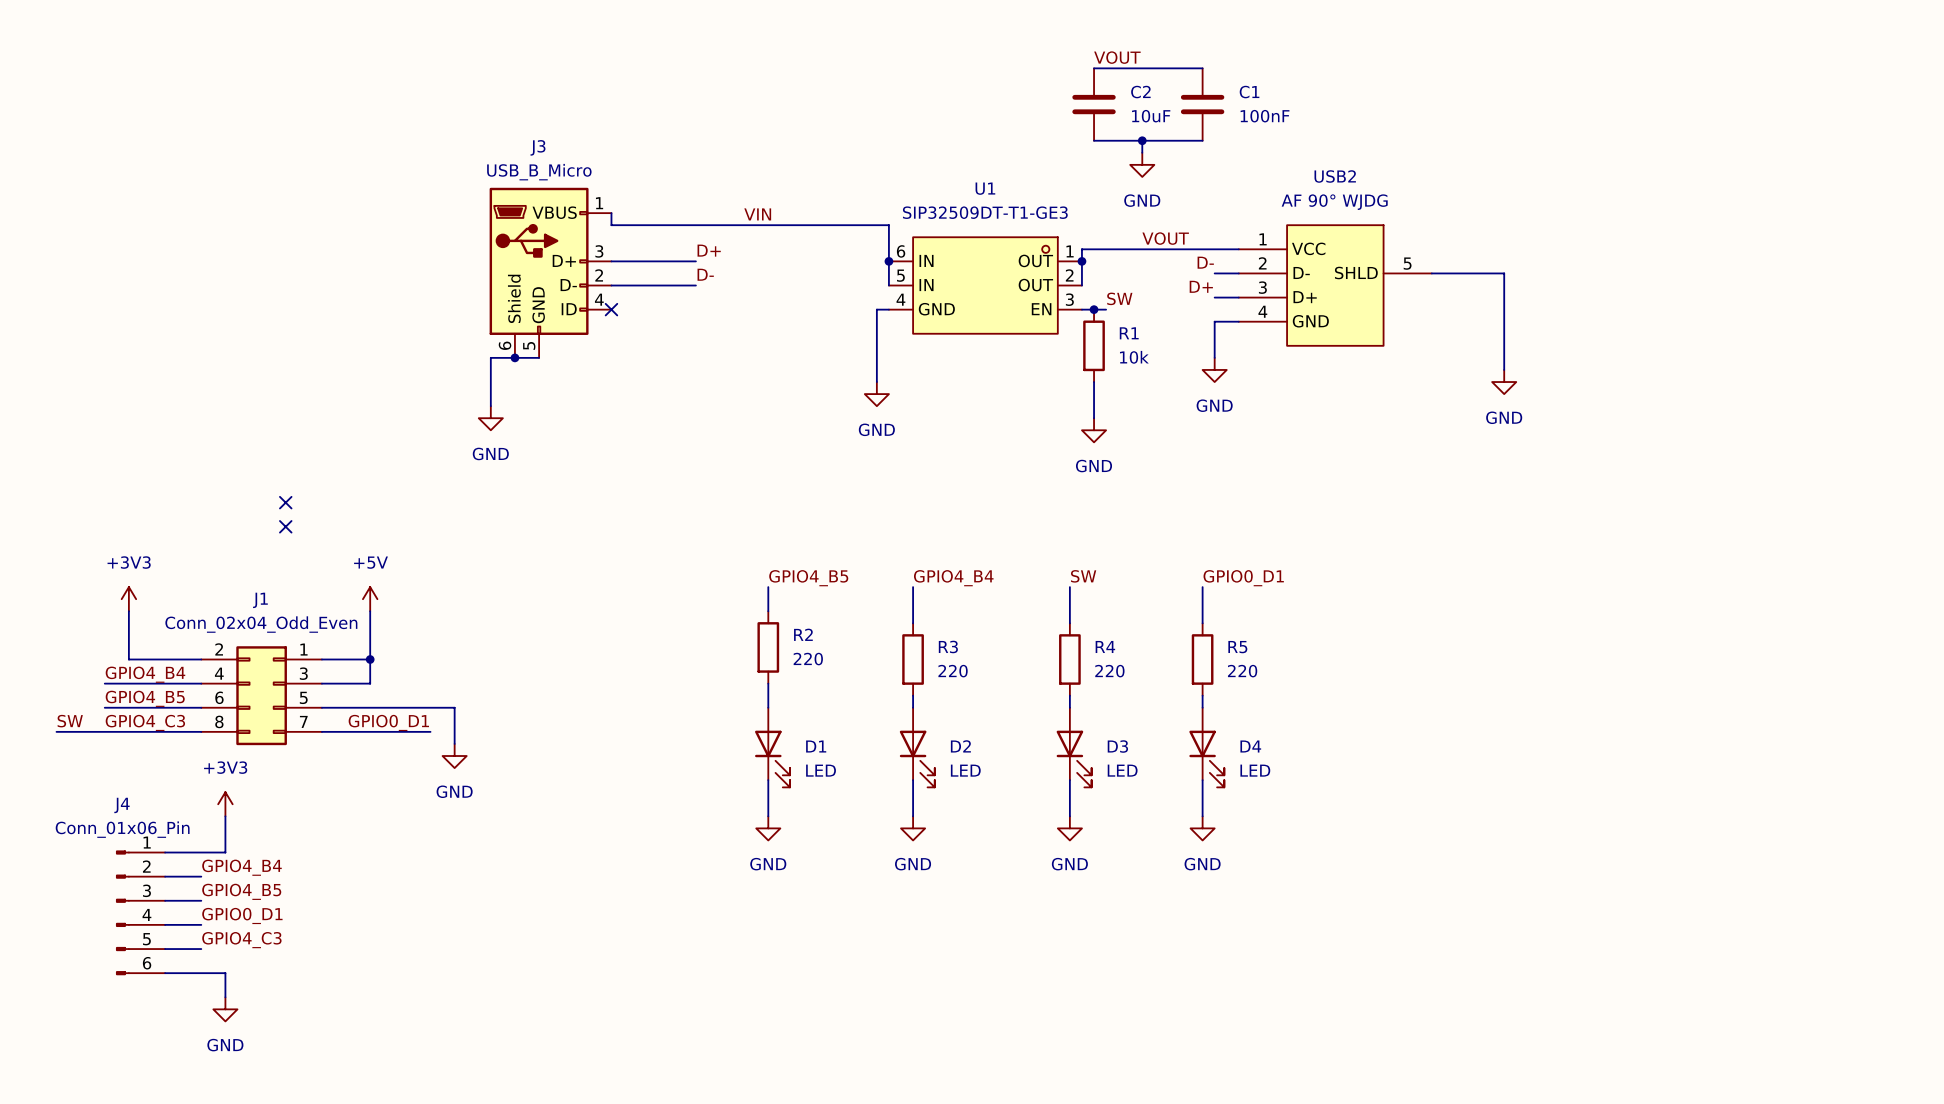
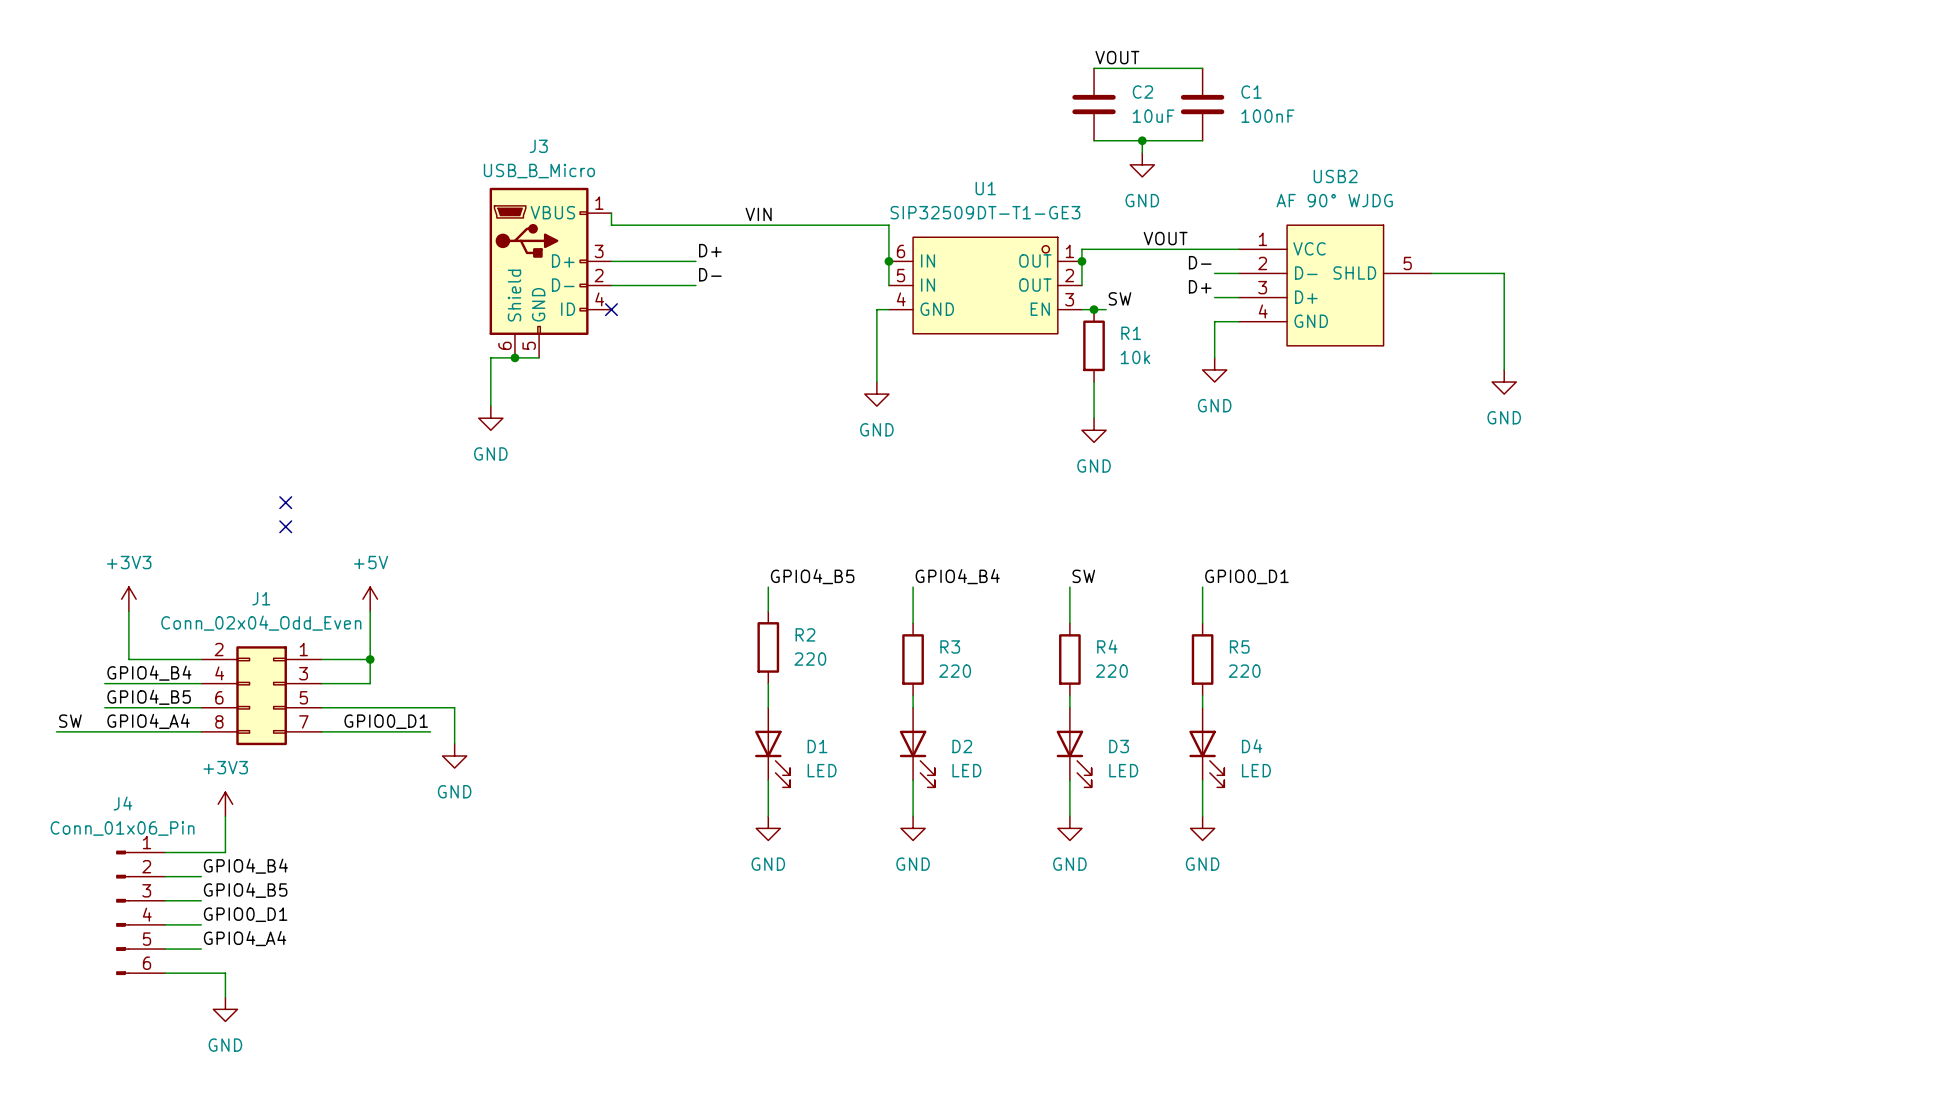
label: GPIO4_C3 (145, 722) -> GPIO4_A4 (148, 721)
label: GPIO4_C3 (241, 940) -> GPIO4_A4 (245, 938)

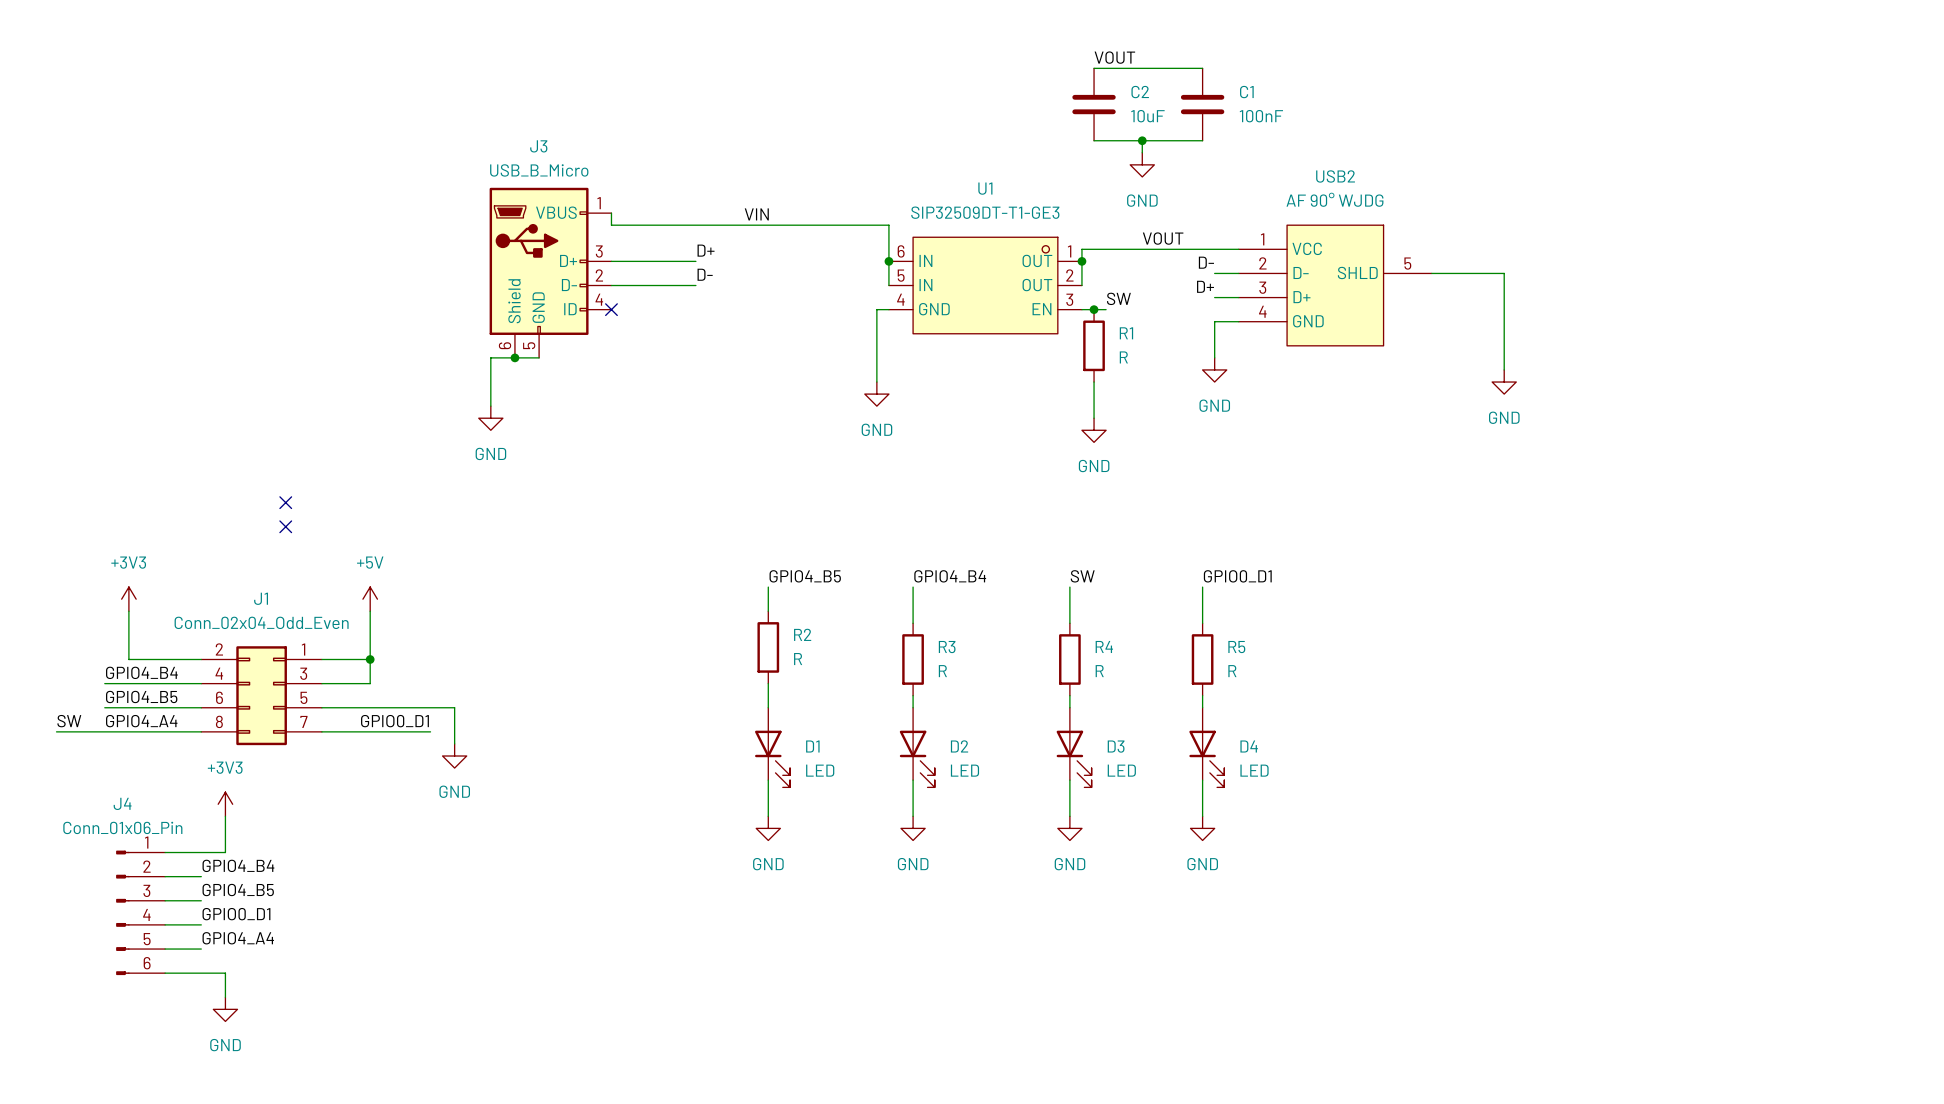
R1 value: 10k (1135, 357) -> R (1123, 357)
R2 value: 220 (810, 659) -> R (798, 659)
R3 value: 220 (955, 671) -> R (942, 671)
R4 value: 220 (1111, 671) -> R (1099, 671)
R5 value: 220 (1244, 671) -> R (1232, 671)

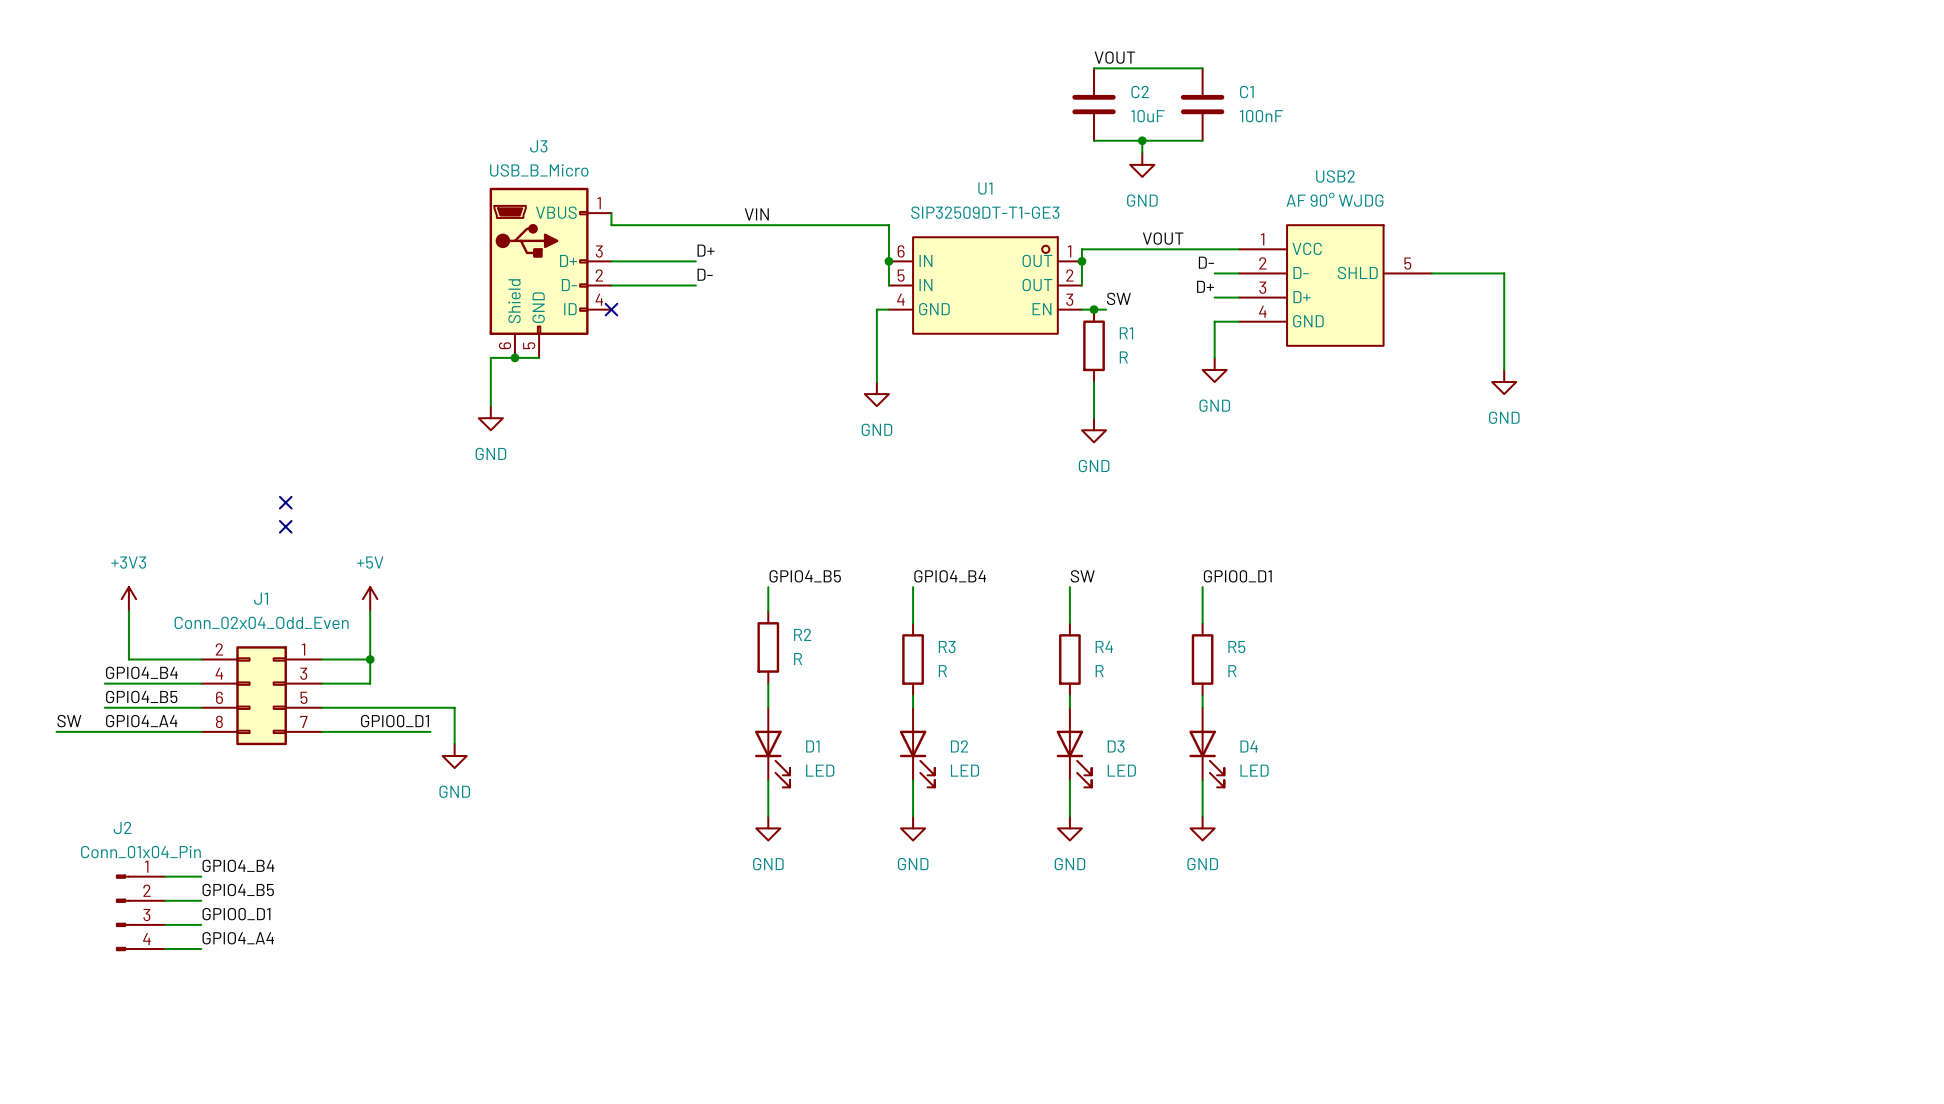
power symbol: +3V3 (225, 804) -> none
wire: (225, 816) (225, 852) (165, 852) -> none
J4: Conn_01x06_Pin (140, 912) -> none
J2: none -> Conn_01x04_Pin (140, 912)
wire: (165, 973) (225, 973) (225, 997) -> none
power symbol: GND (225, 1009) -> none

